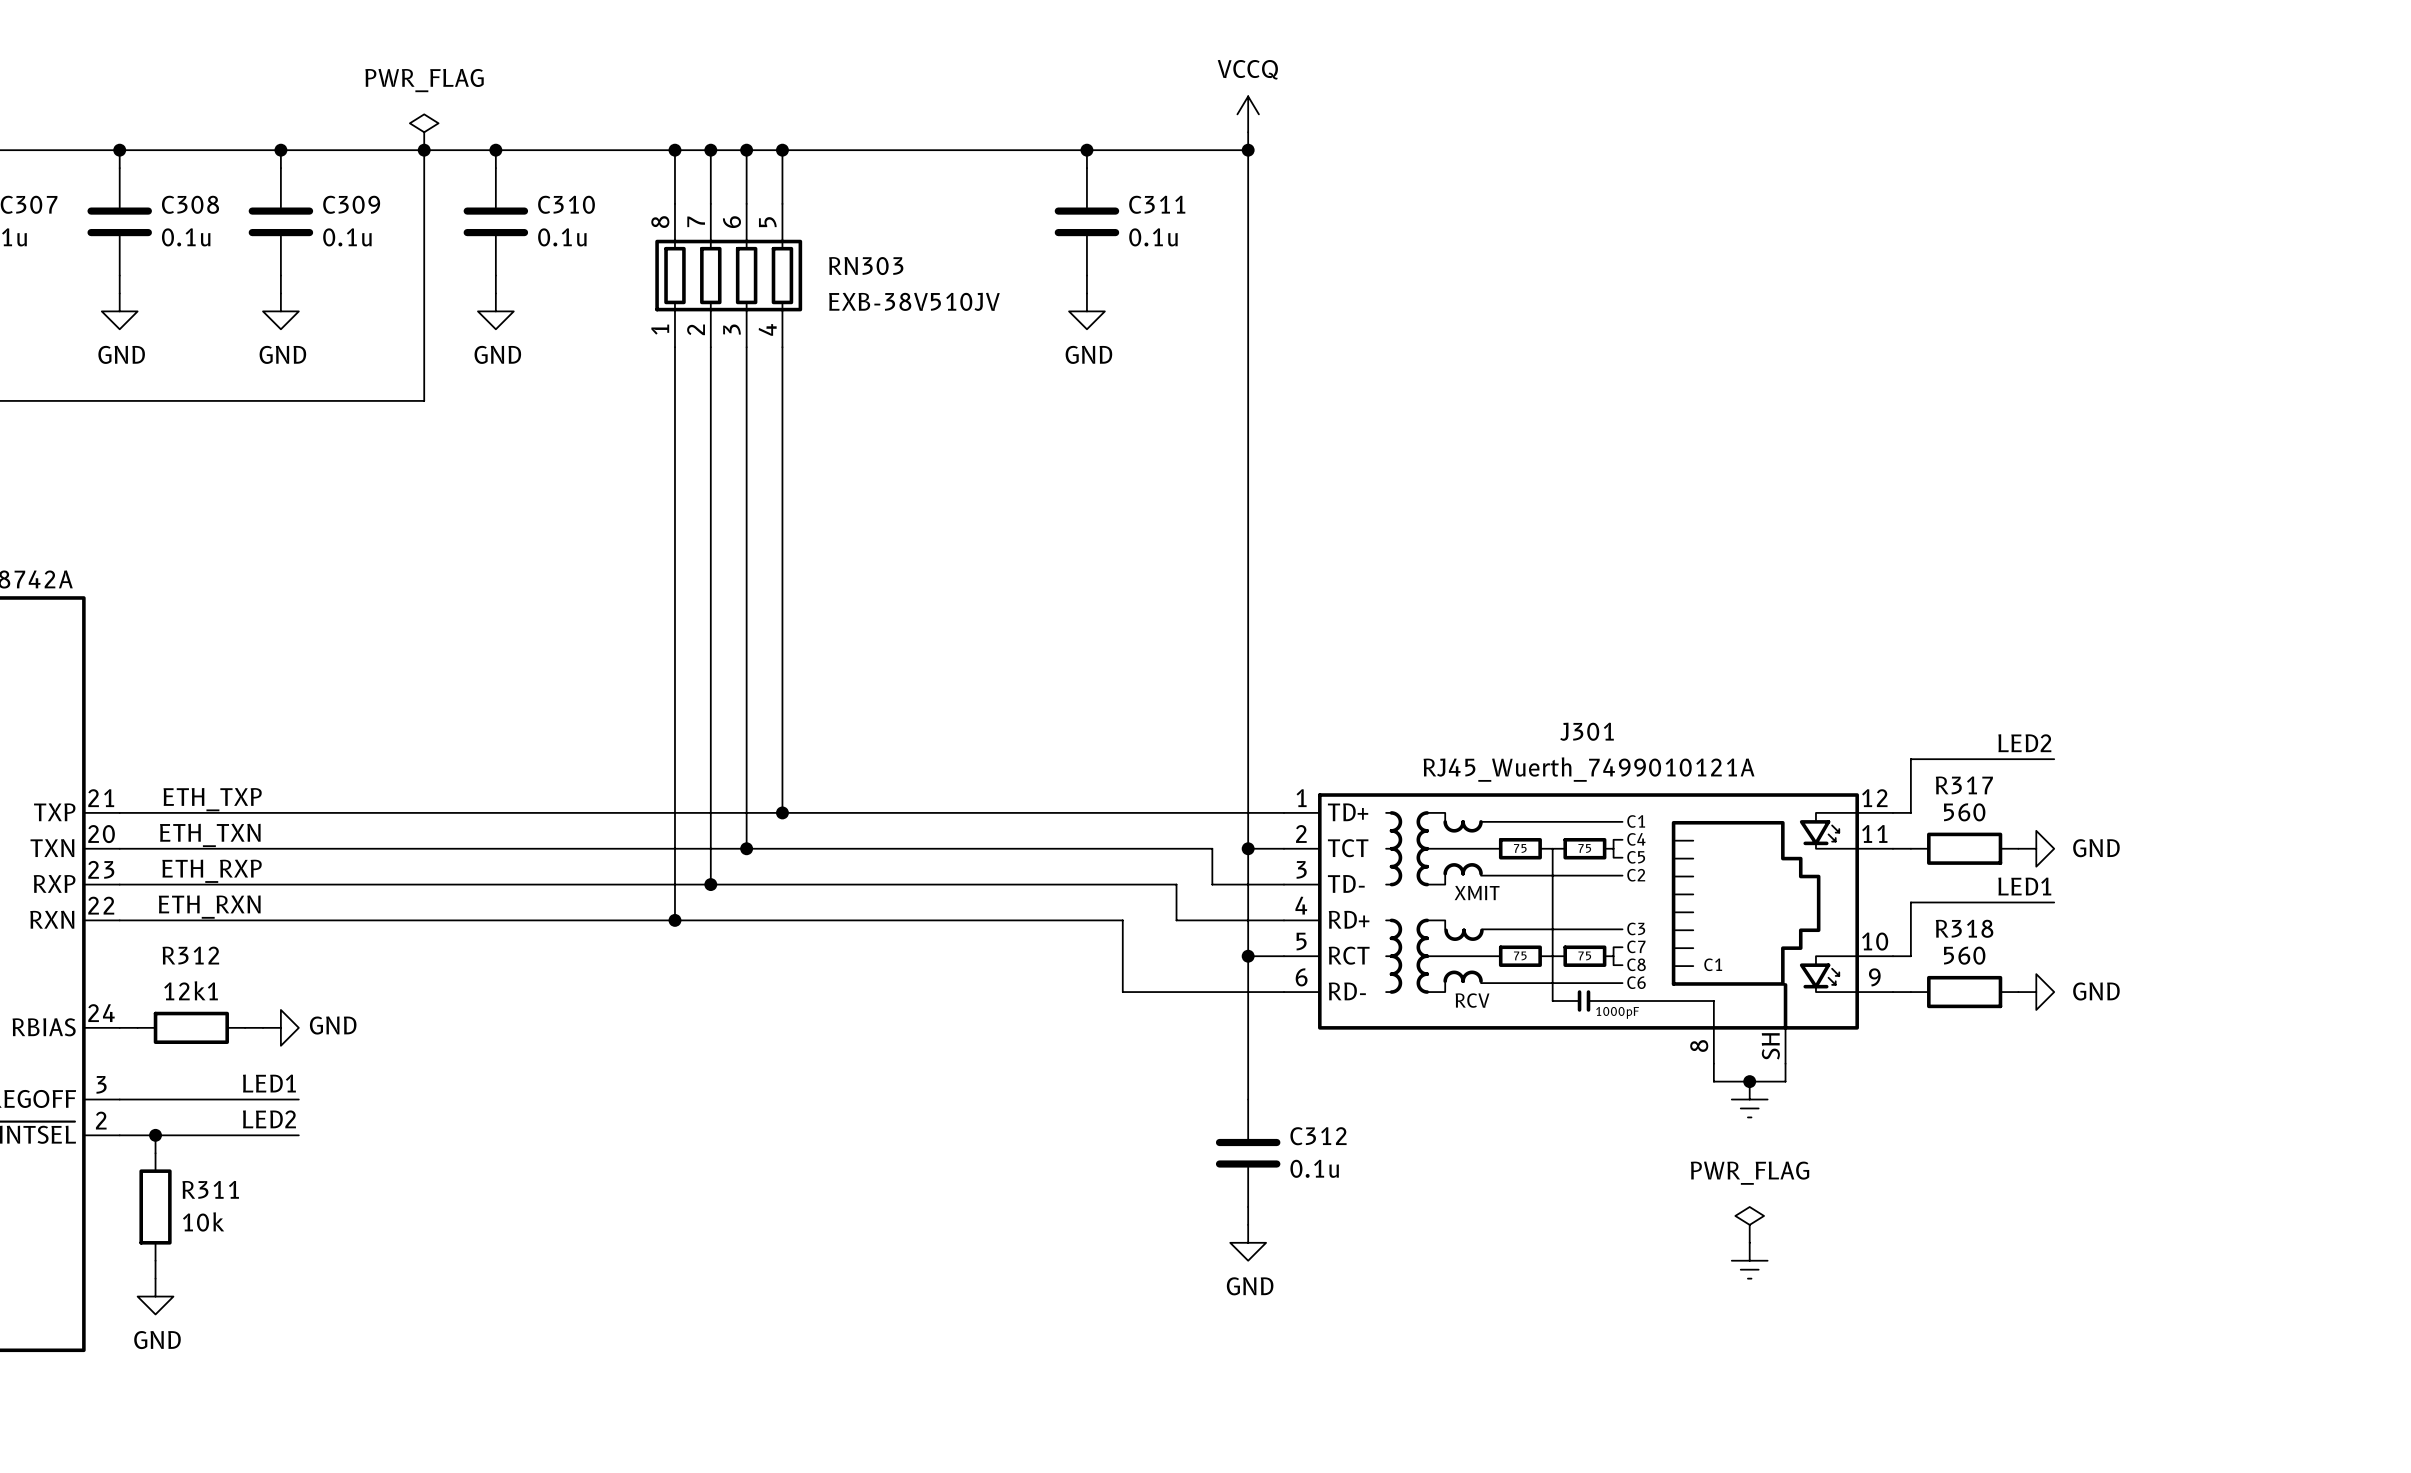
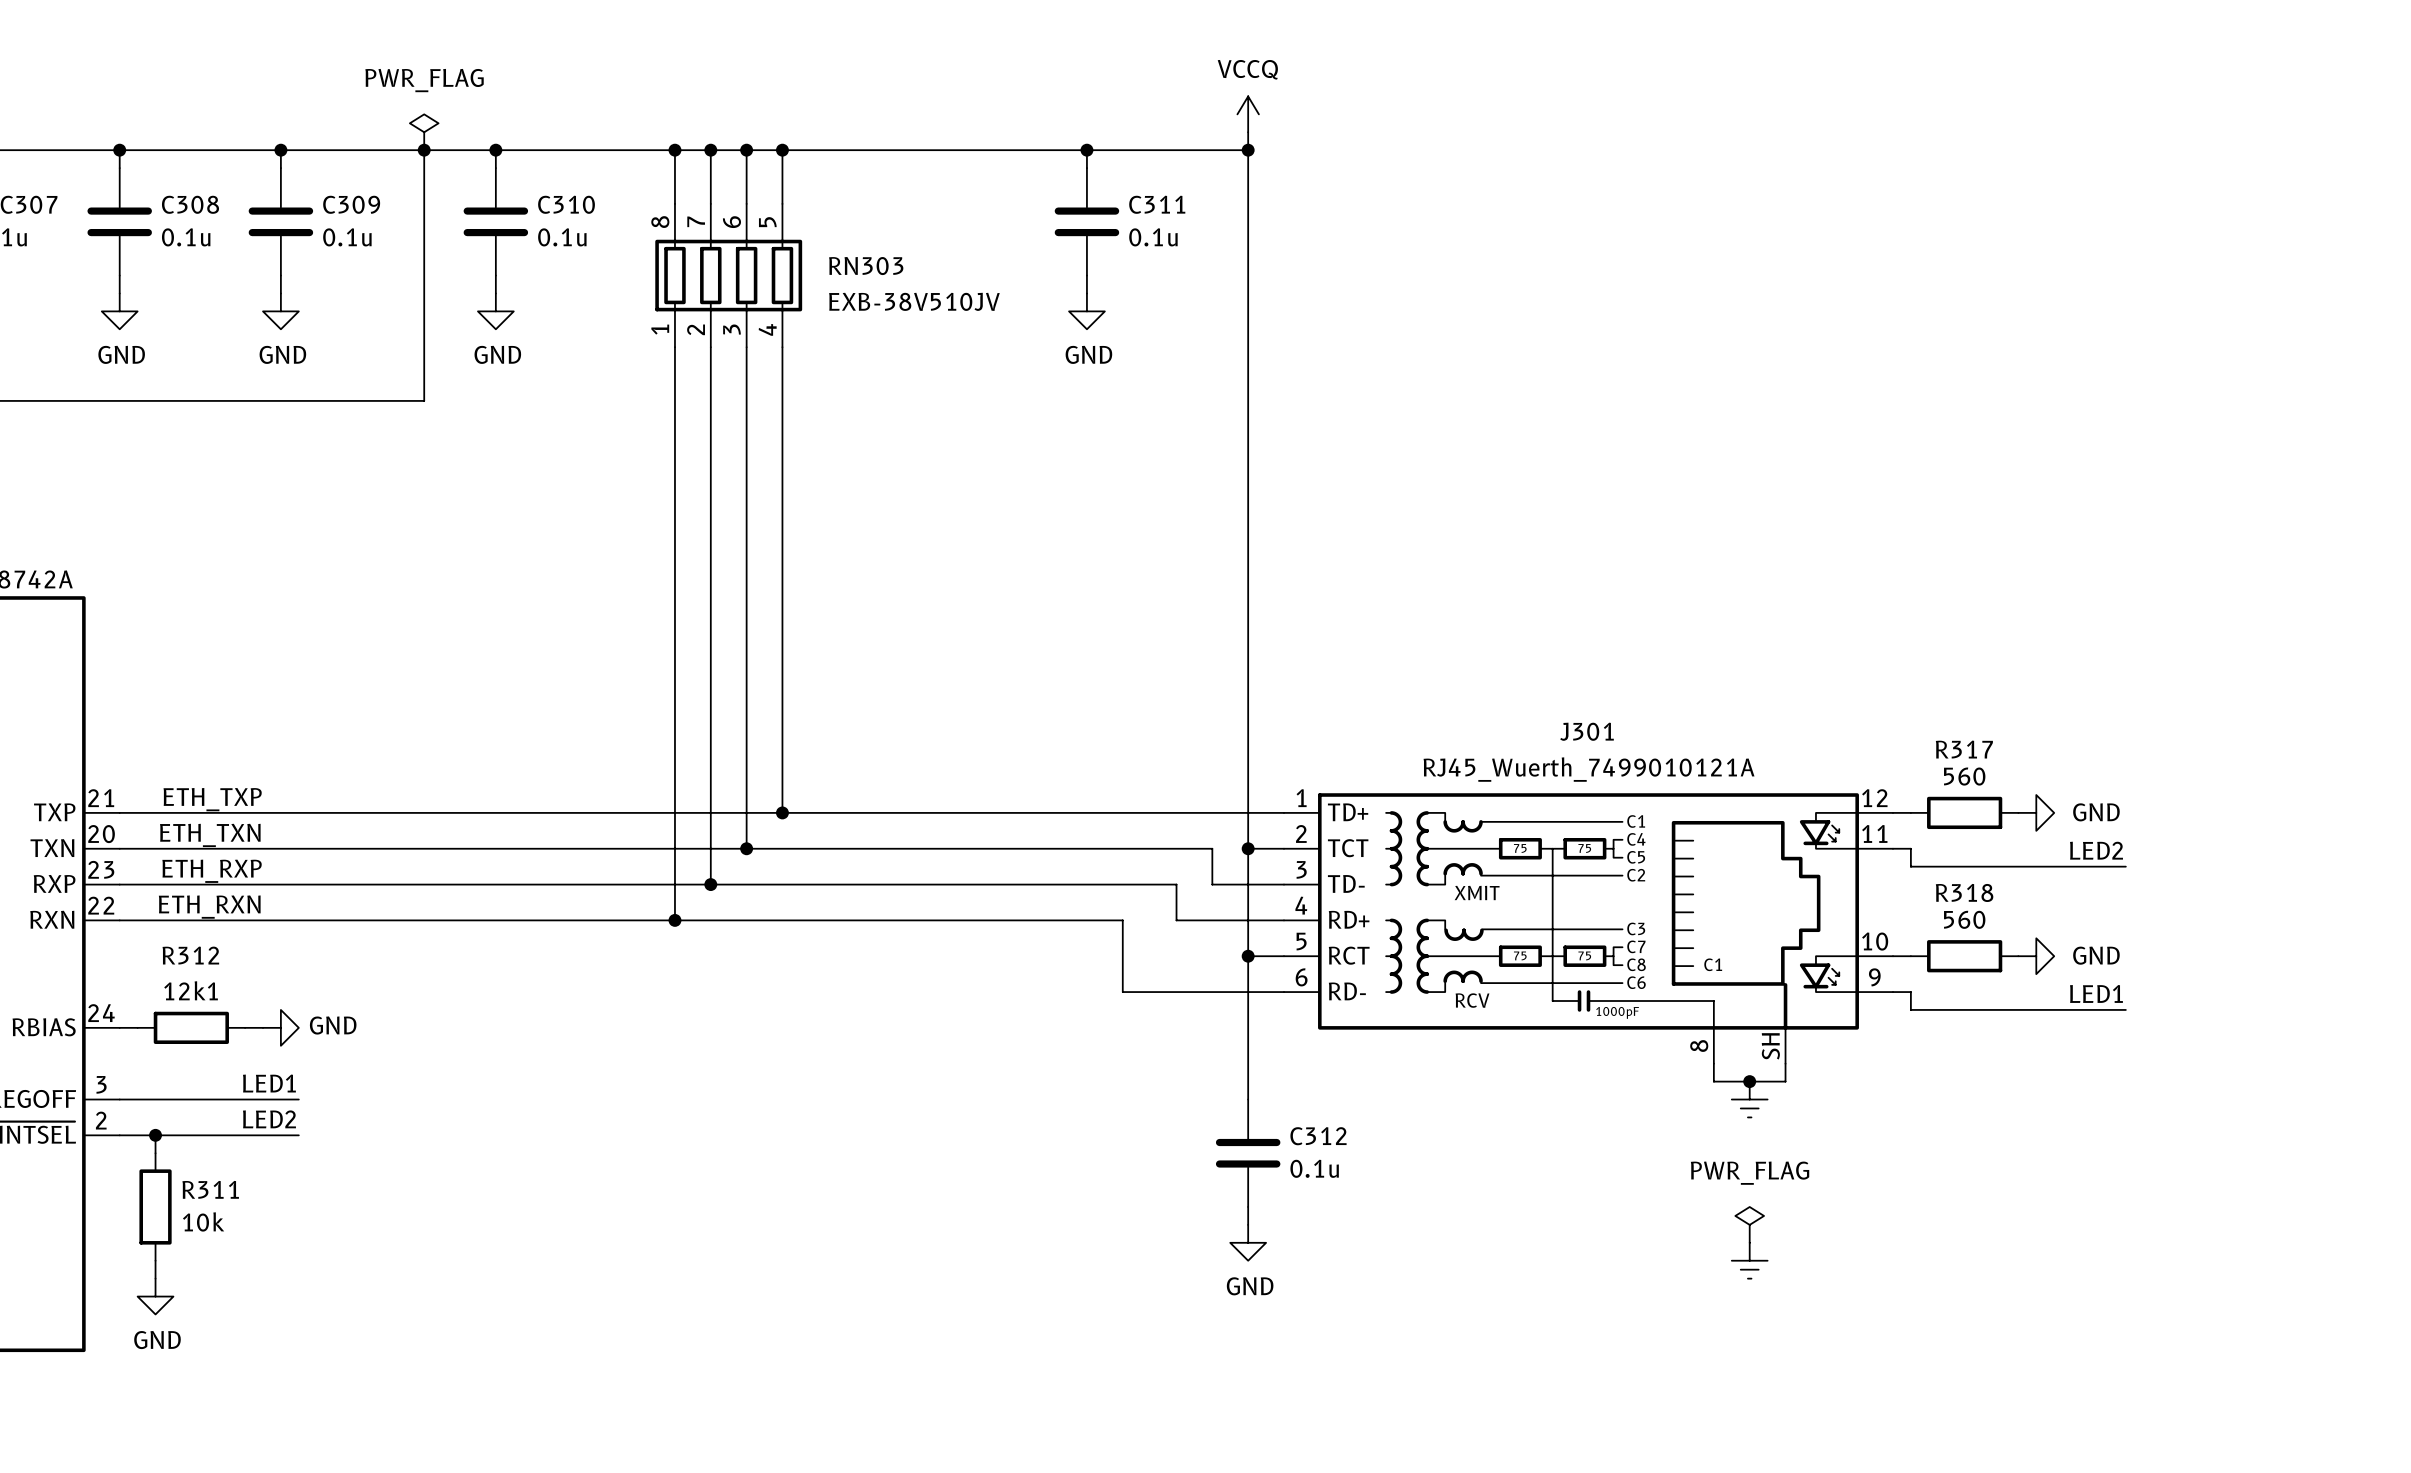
label position: LED2 (2024, 743) -> LED2 (2096, 850)
wire: (2054, 759) (1910, 759) (1910, 812) -> none
wire: none -> (1910, 848) (1910, 866) (2125, 866)
R317 position: (1964, 848) -> (1964, 812)
power symbol position: GND (2036, 848) -> GND (2036, 812)
label position: LED1 (2024, 886) -> LED1 (2096, 993)
wire: (2054, 902) (1910, 902) (1910, 956) -> none
wire: none -> (1910, 992) (1910, 1009) (2125, 1009)
R318 position: (1964, 992) -> (1964, 956)
power symbol position: GND (2036, 992) -> GND (2036, 956)

